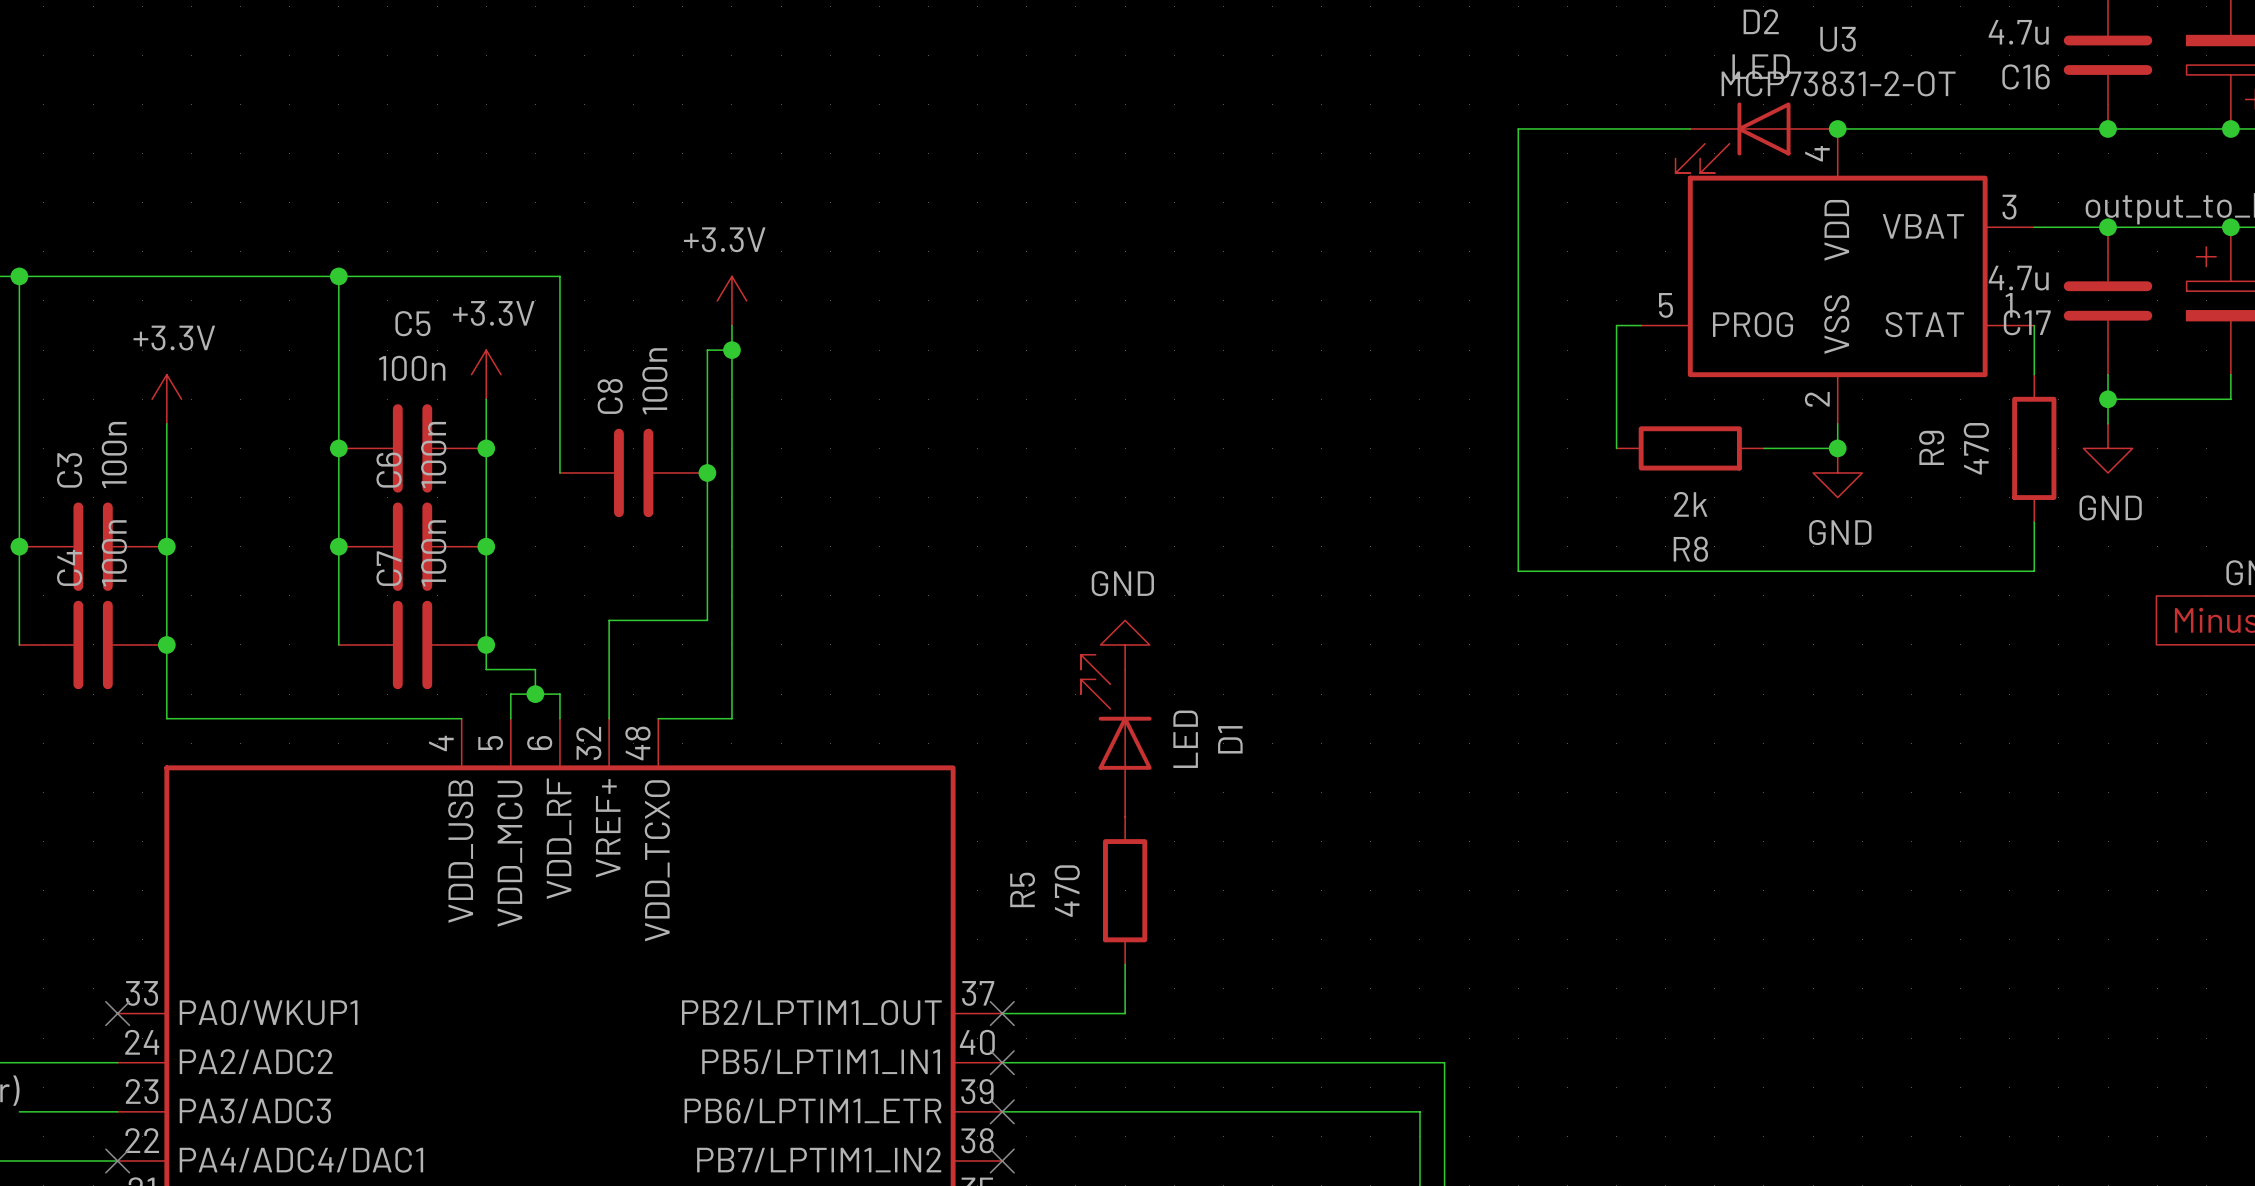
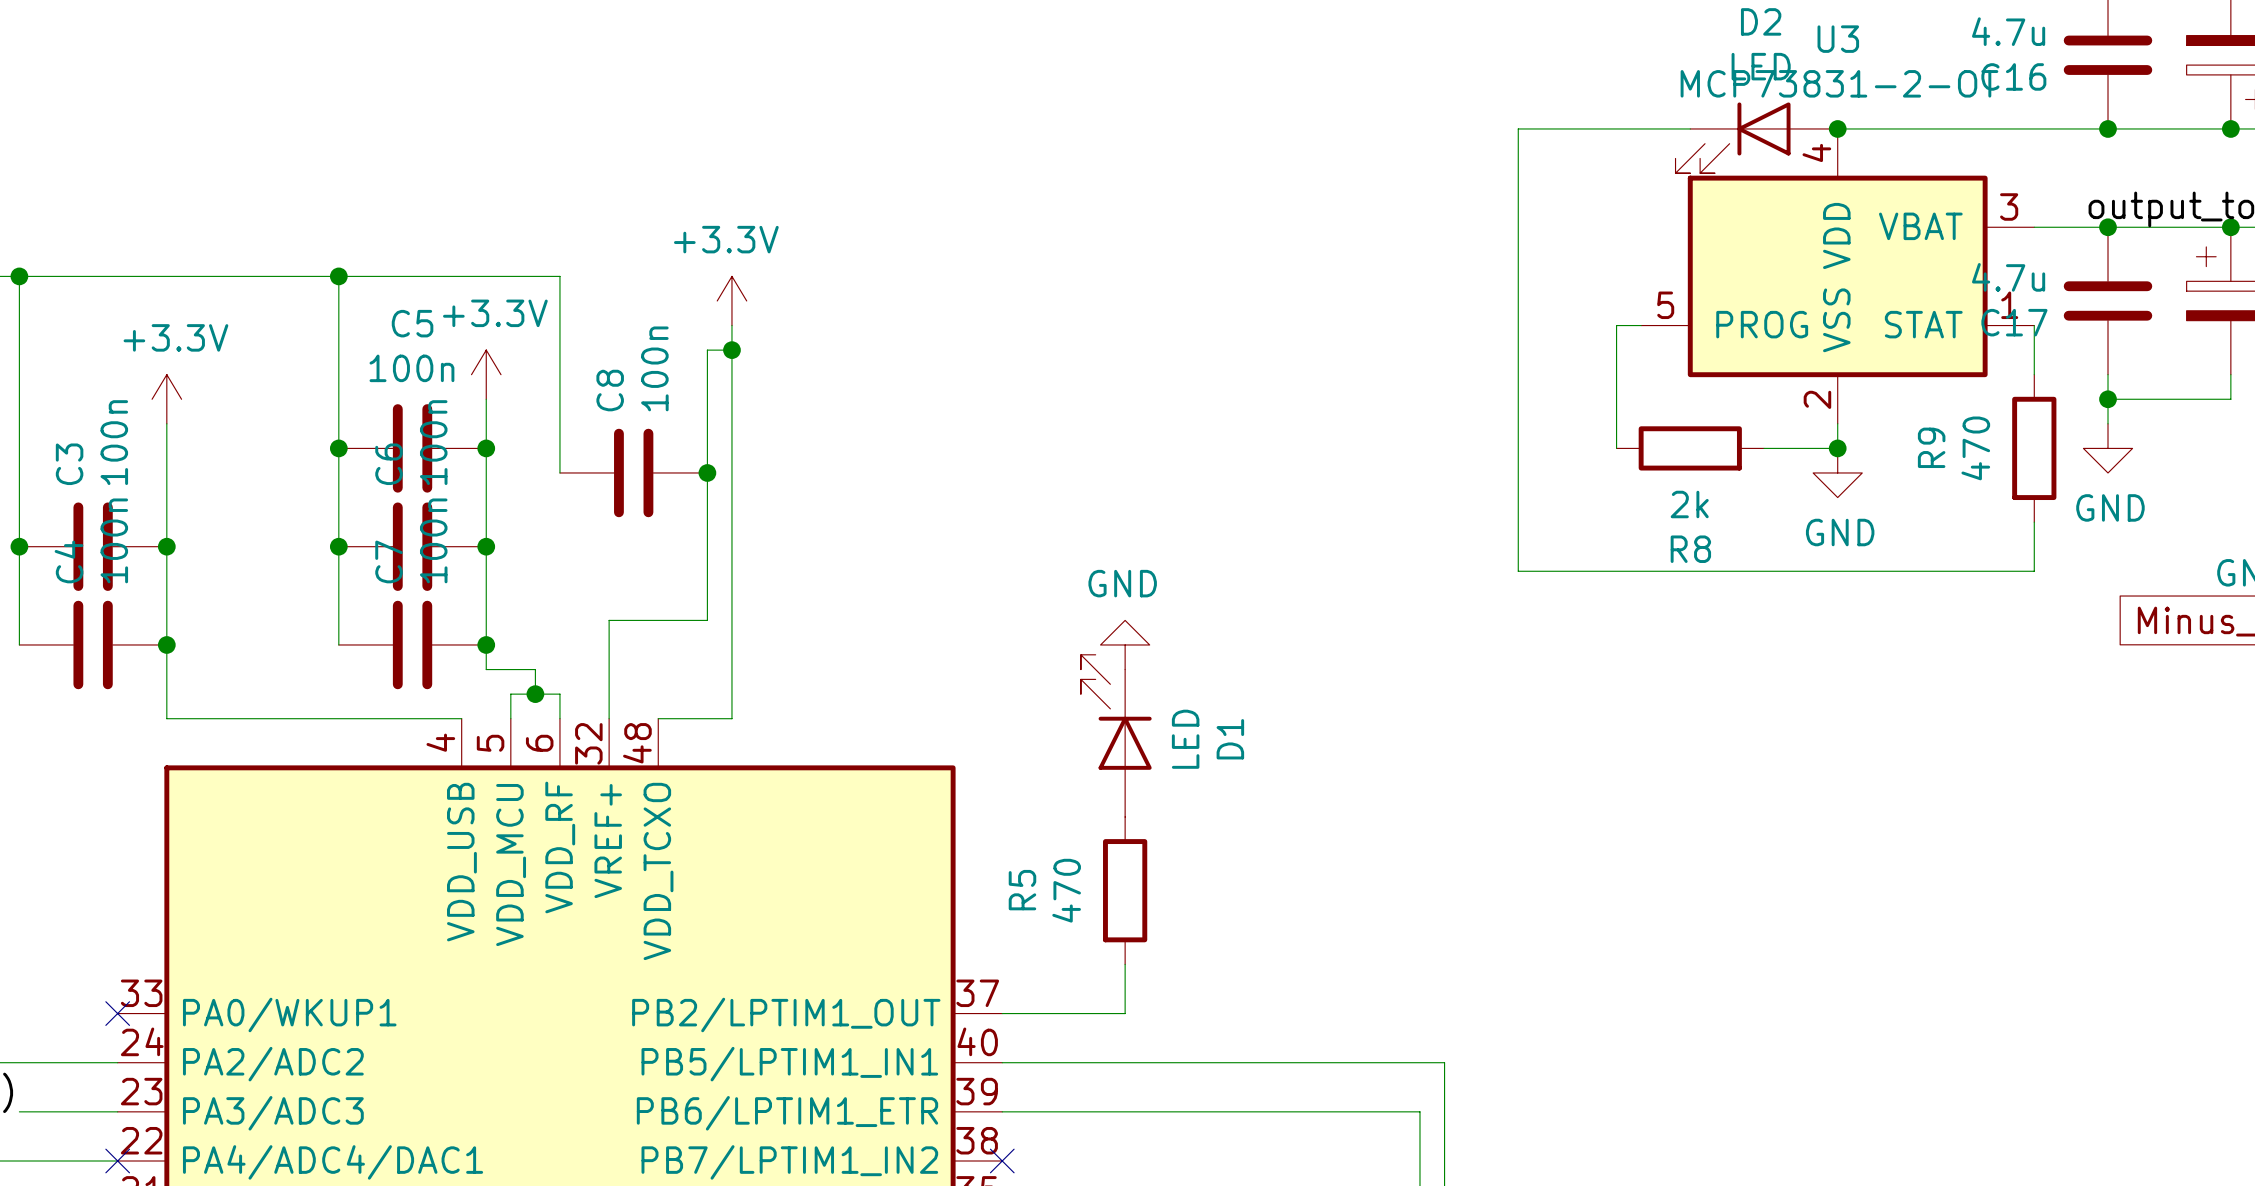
no-connect mark: (1002, 1013) -> none
no-connect mark: (1002, 1062) -> none
no-connect mark: (1002, 1111) -> none

